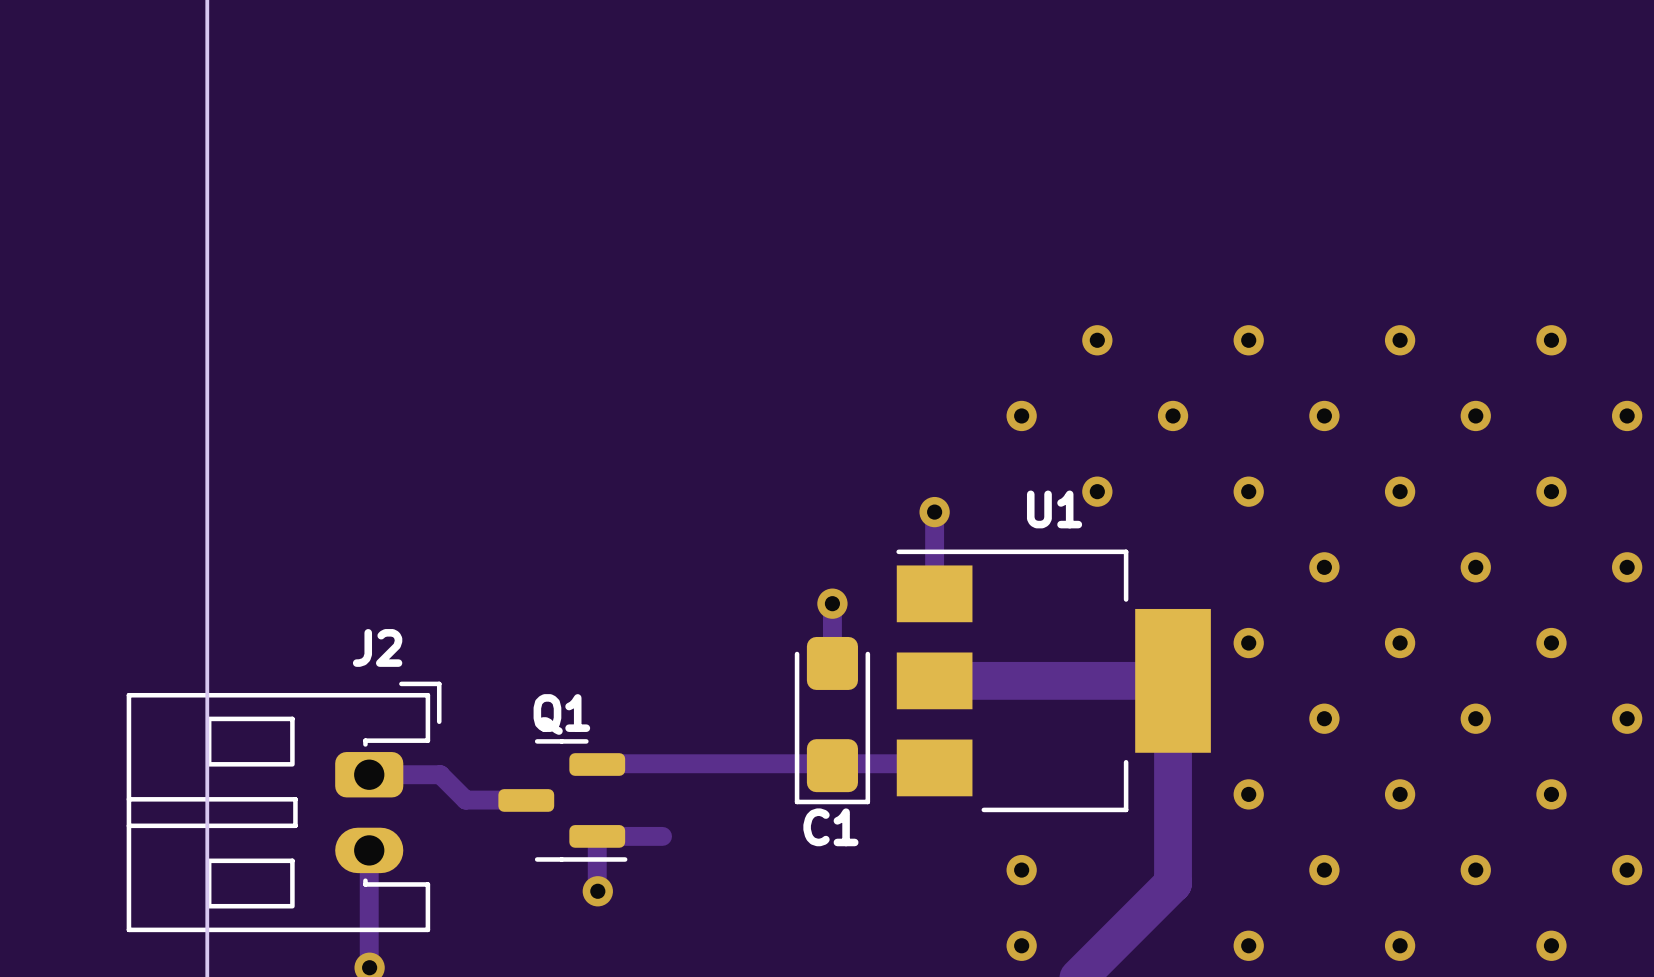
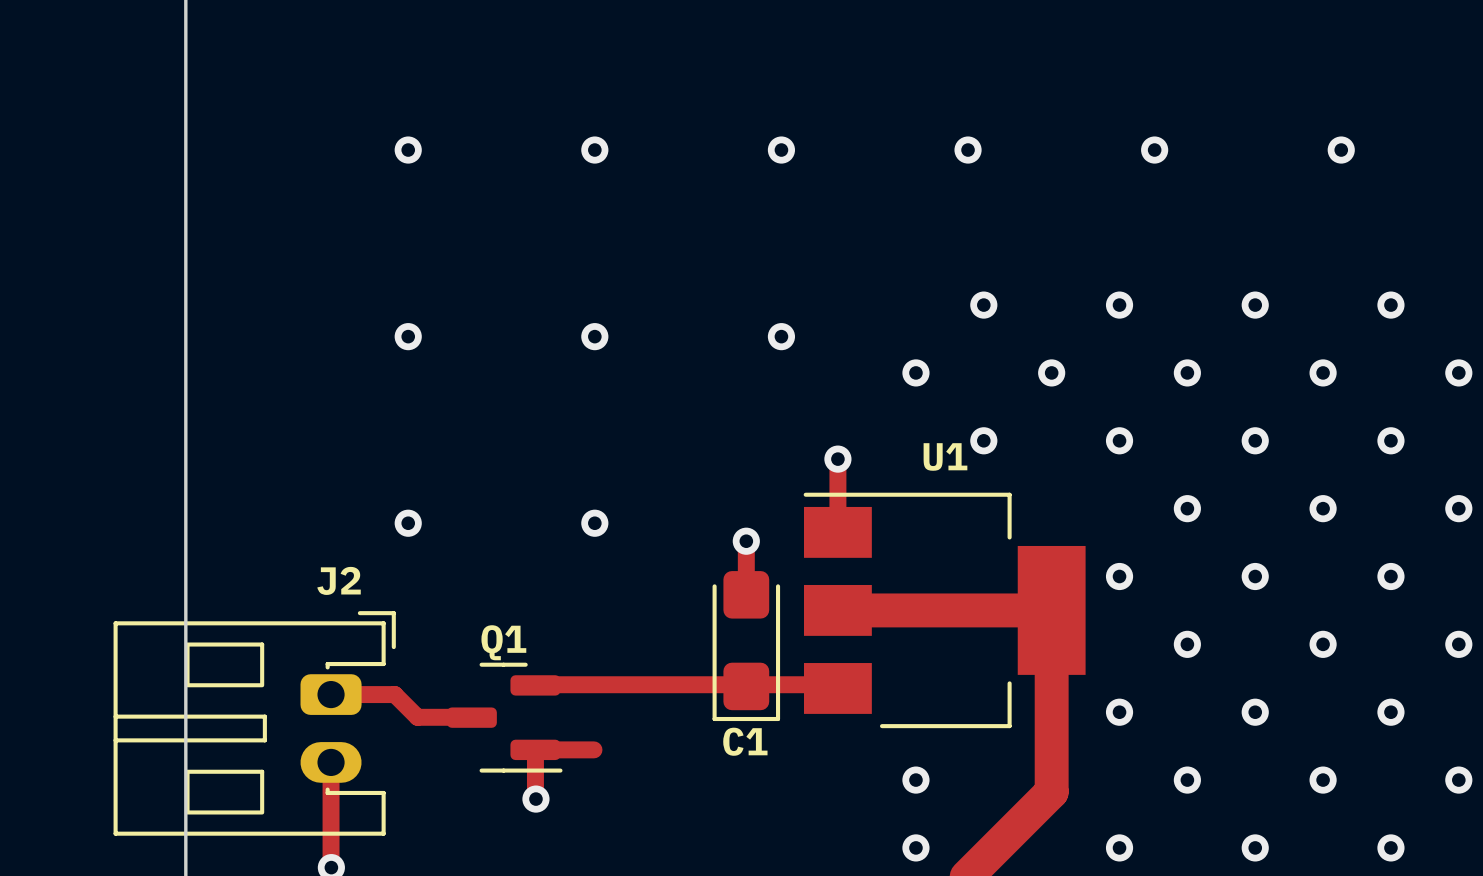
via: none -> (408, 150)
via: none -> (594, 150)
via: none -> (781, 150)
via: none -> (968, 150)
via: none -> (1154, 150)
via: none -> (1341, 150)
via: none -> (408, 336)
via: none -> (594, 336)
via: none -> (781, 336)
via: none -> (408, 523)
via: none -> (594, 523)

